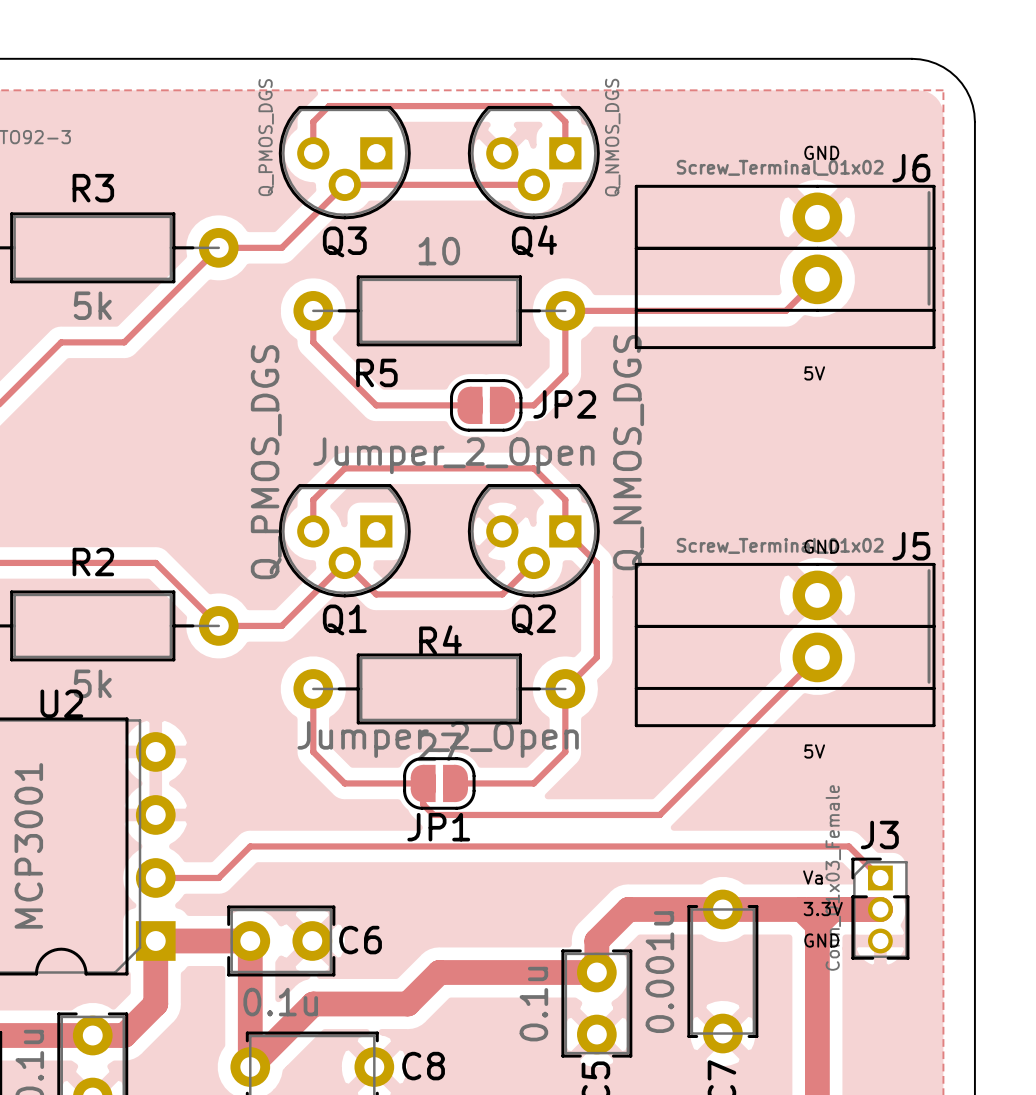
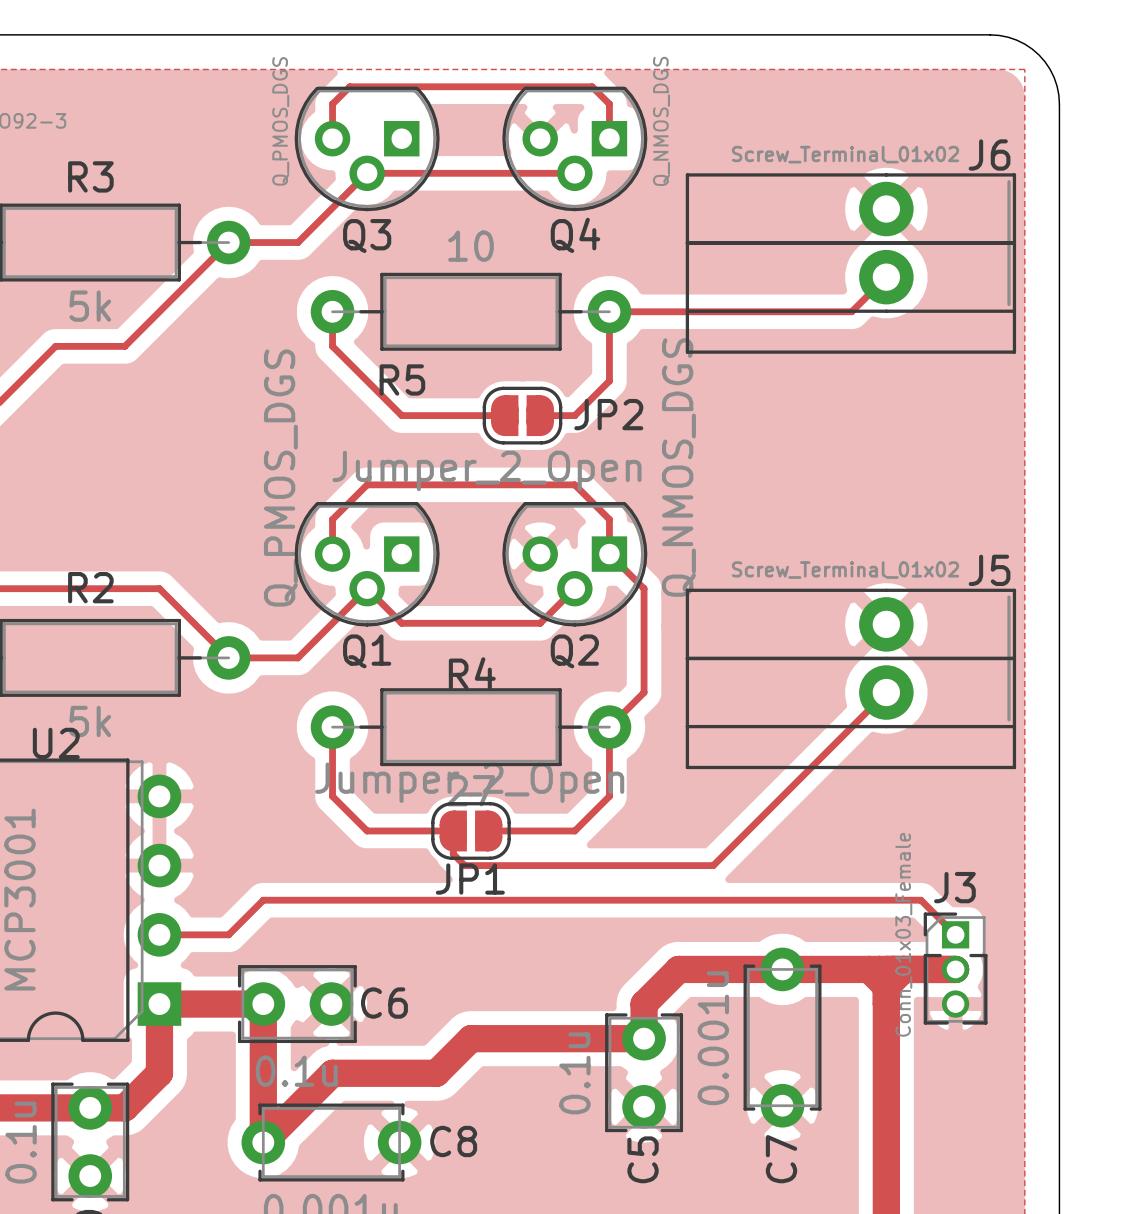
text: GND (821, 152) -> none
text: 5V (814, 373) -> none
text: GND (821, 546) -> none
text: 5V (814, 751) -> none
text: Va (812, 877) -> none
text: 3.3V (823, 909) -> none
text: GND (821, 940) -> none

